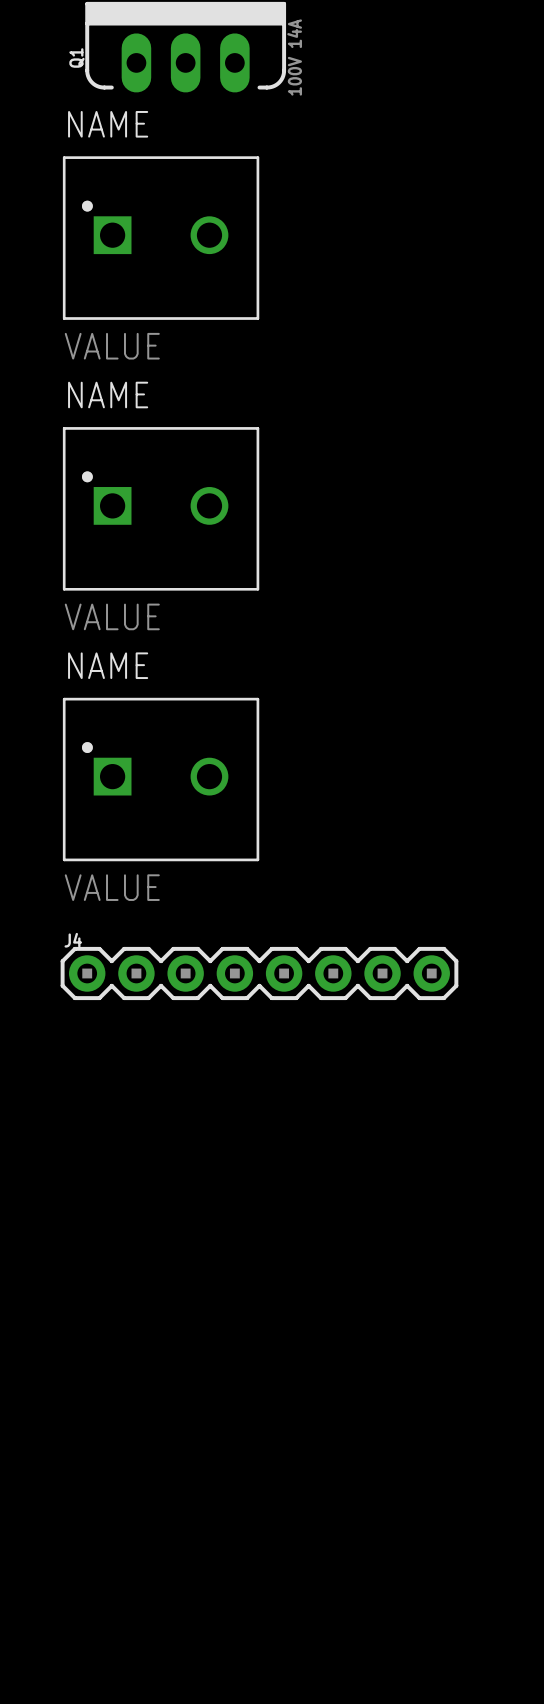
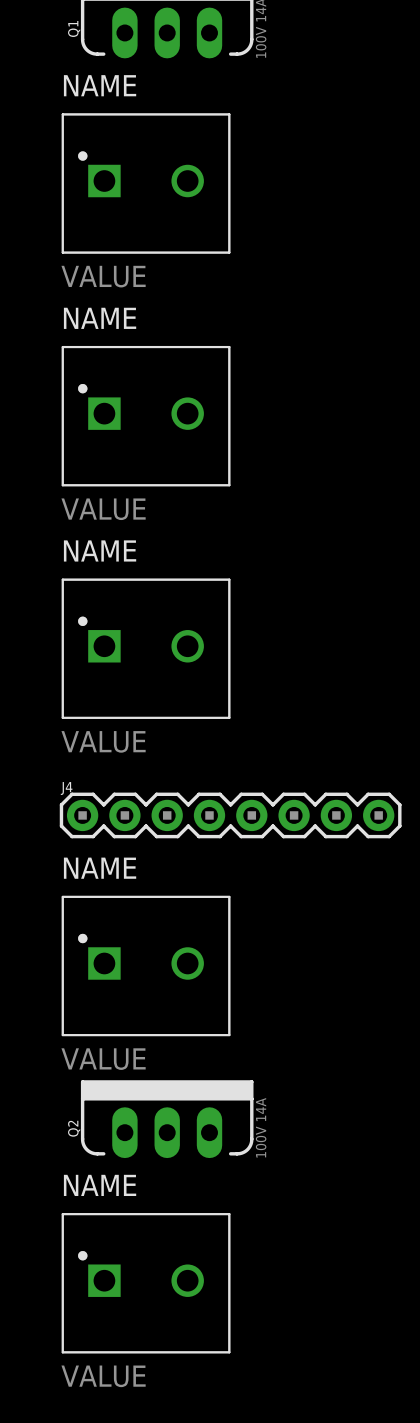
part: none -> (146, 965)
Q2: none -> 100V 14A (167, 1119)
part: none -> (146, 1283)

